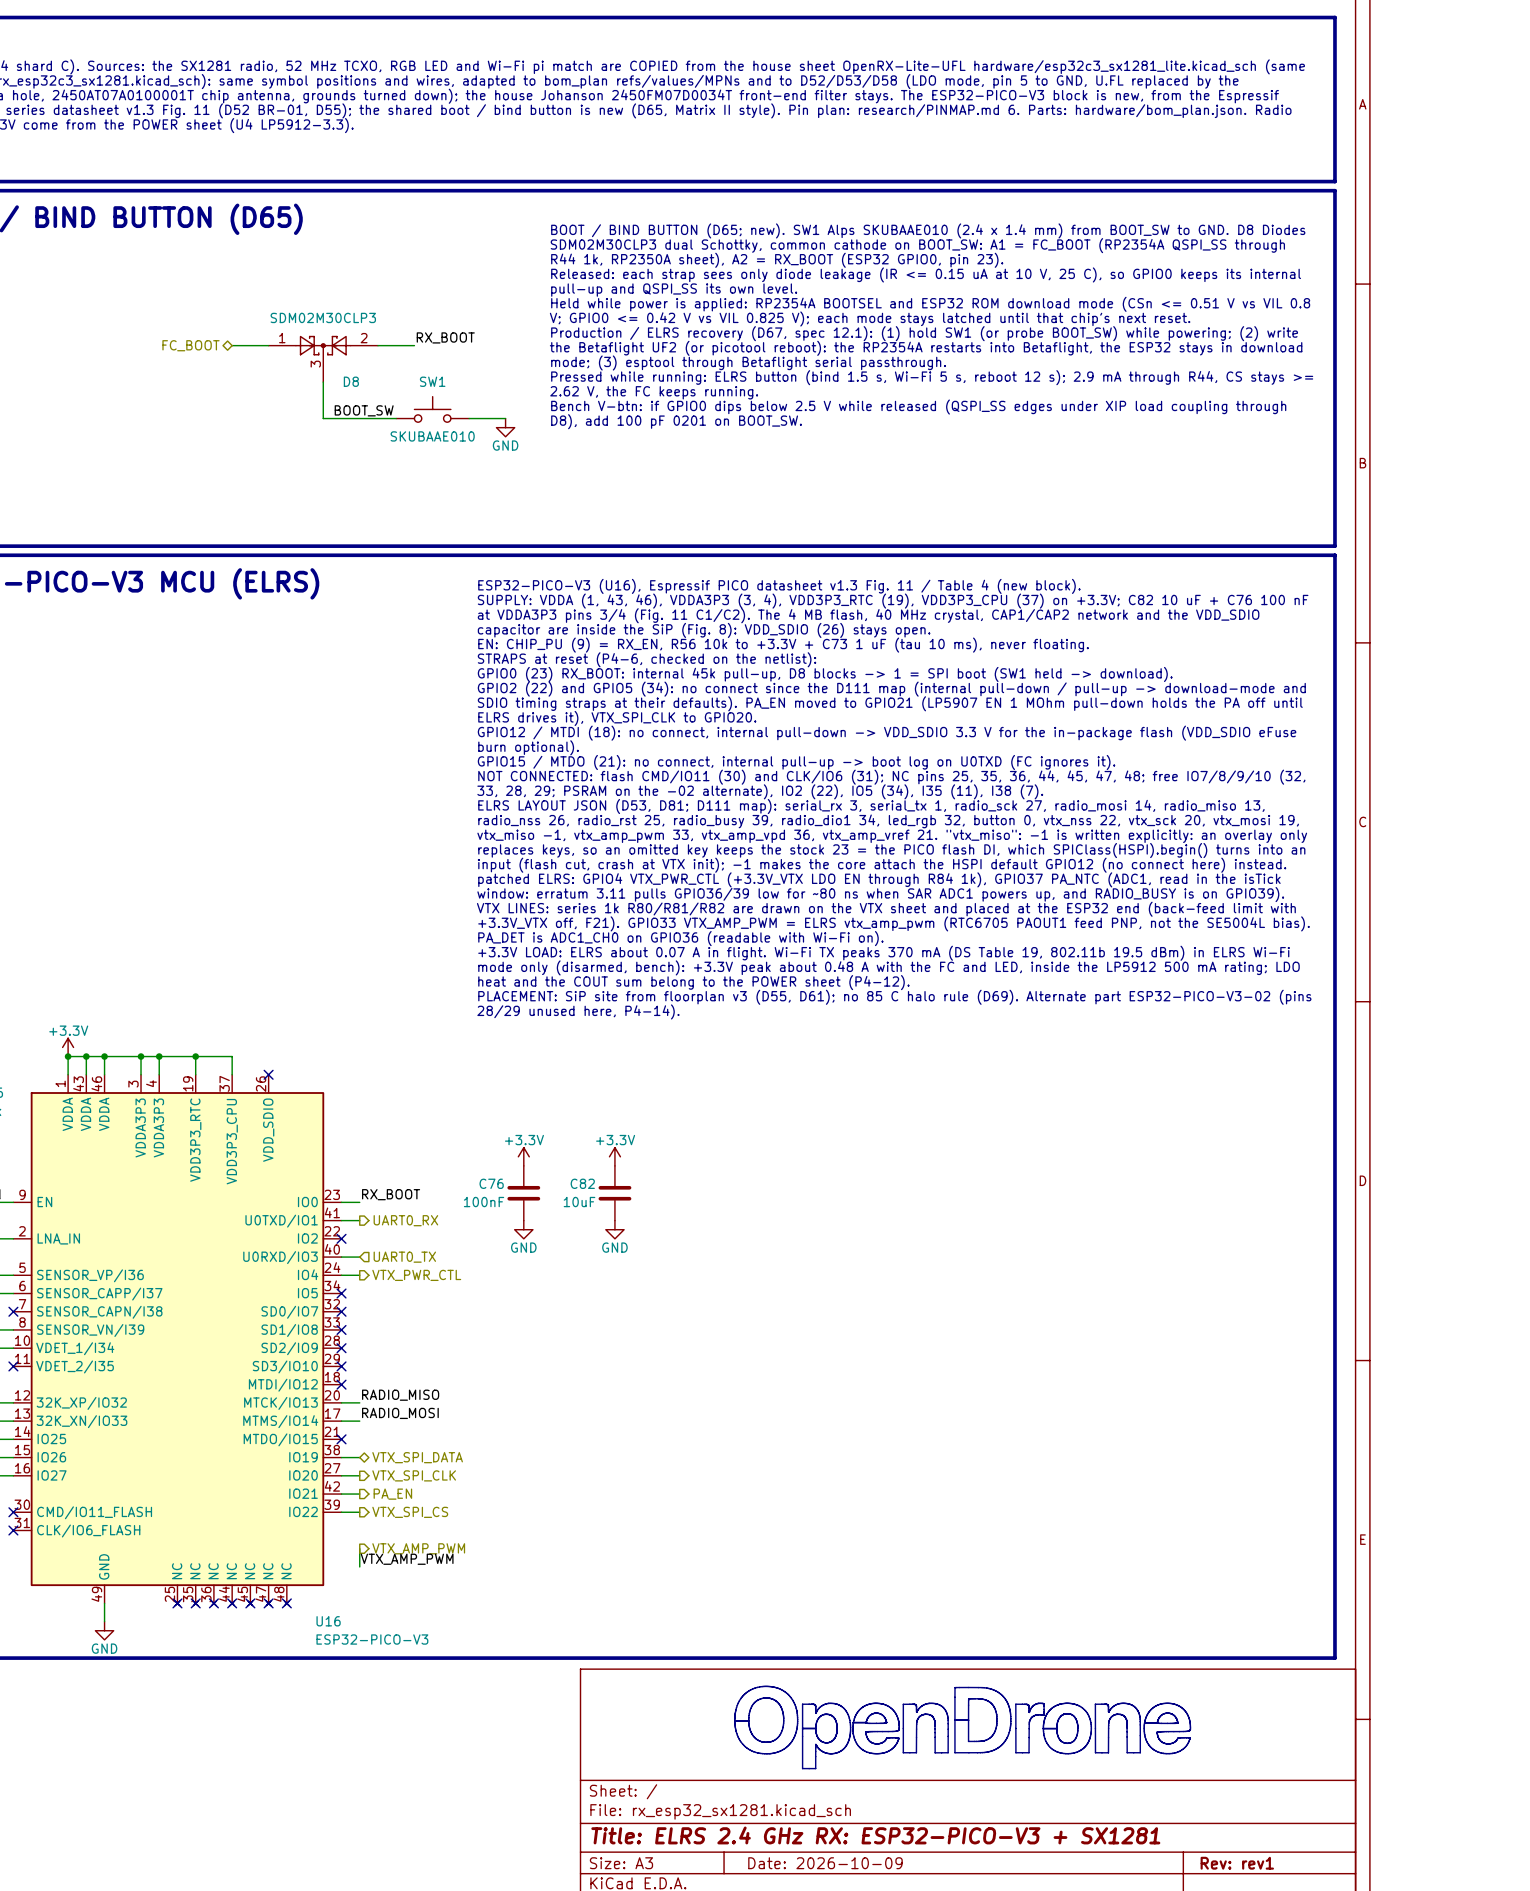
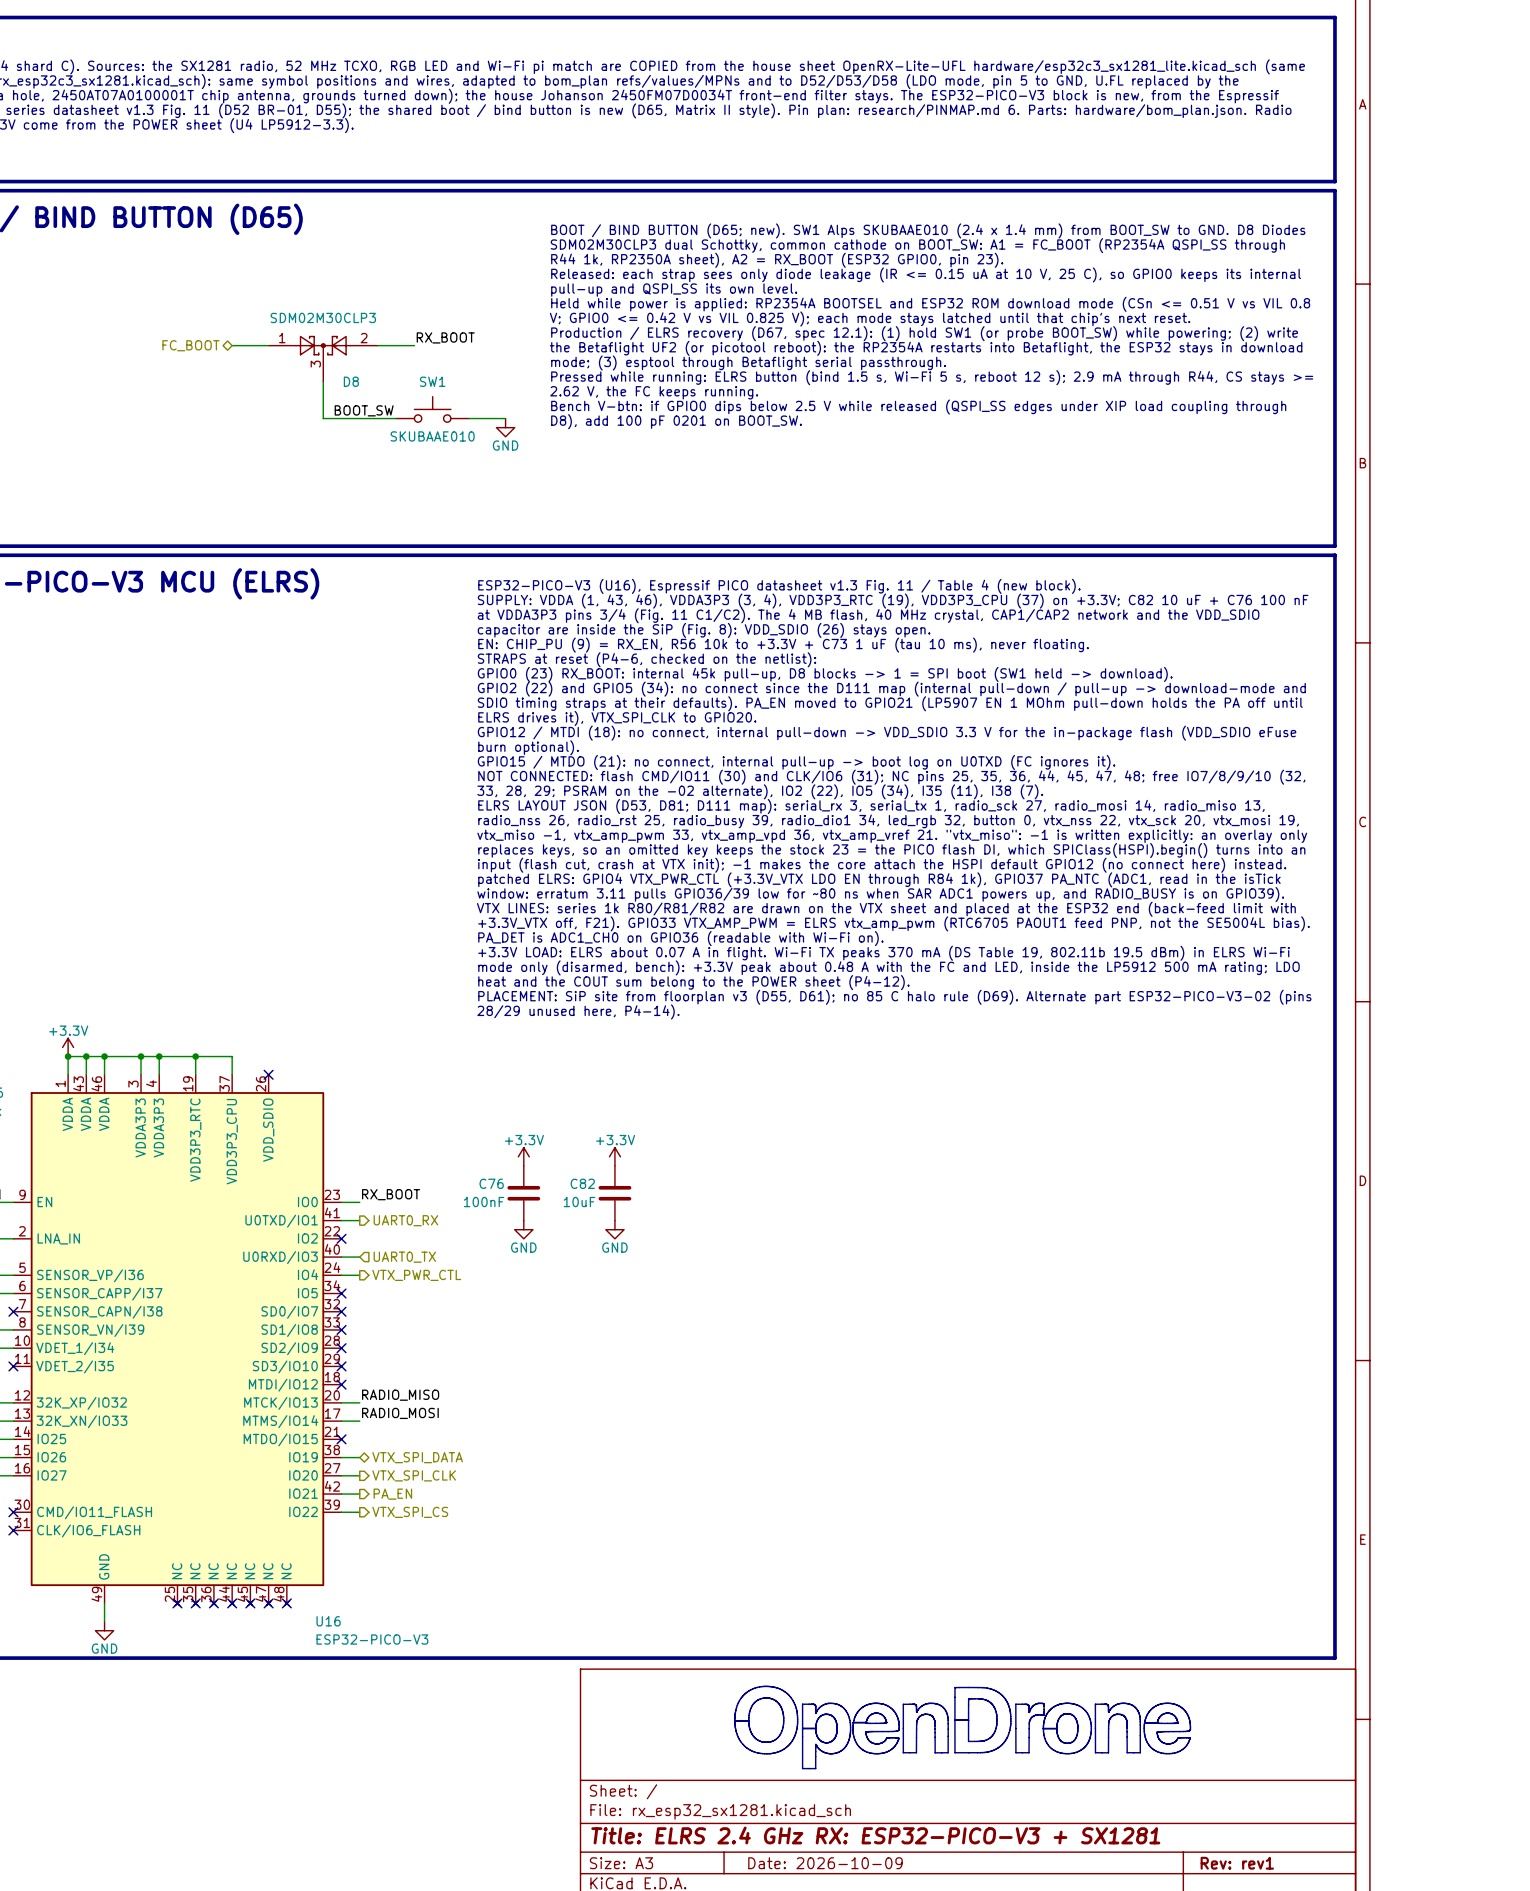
wire: (359, 1548) (359, 1566) -> none
hierarchical label: VTX_AMP_PWM (418, 1548) -> none
label: VTX_AMP_PWM (407, 1559) -> none

